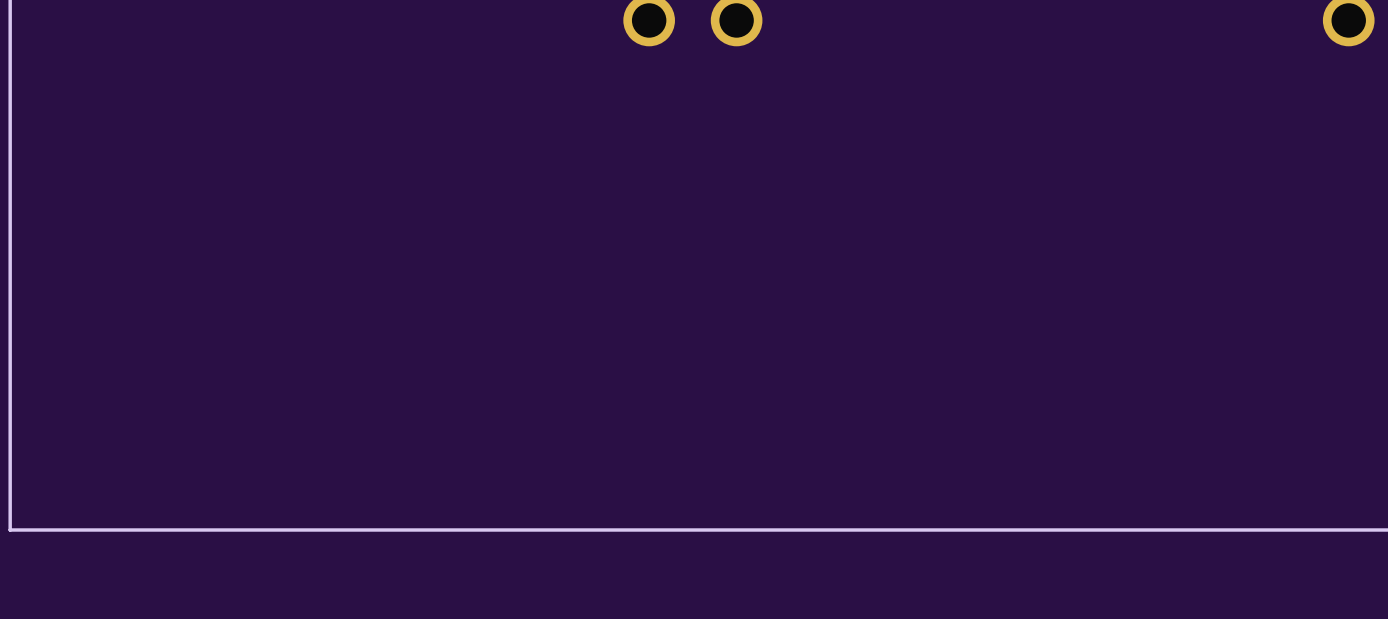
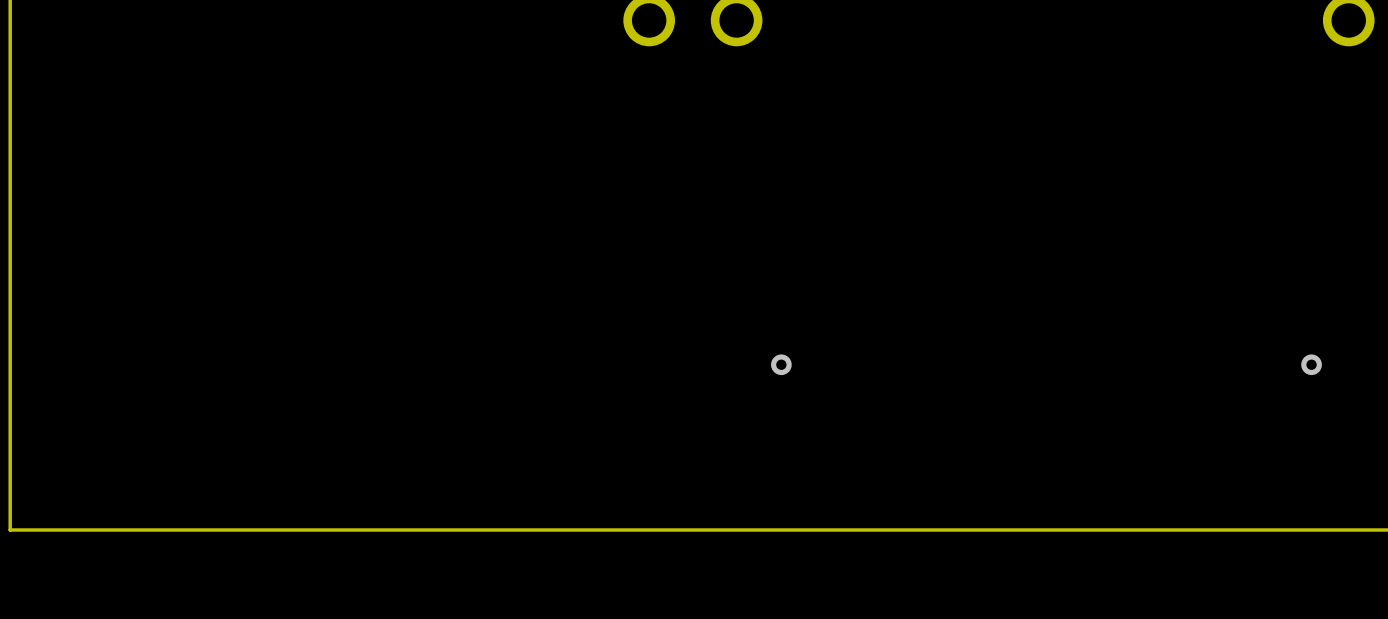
via: none -> (781, 364)
via: none -> (1311, 364)

